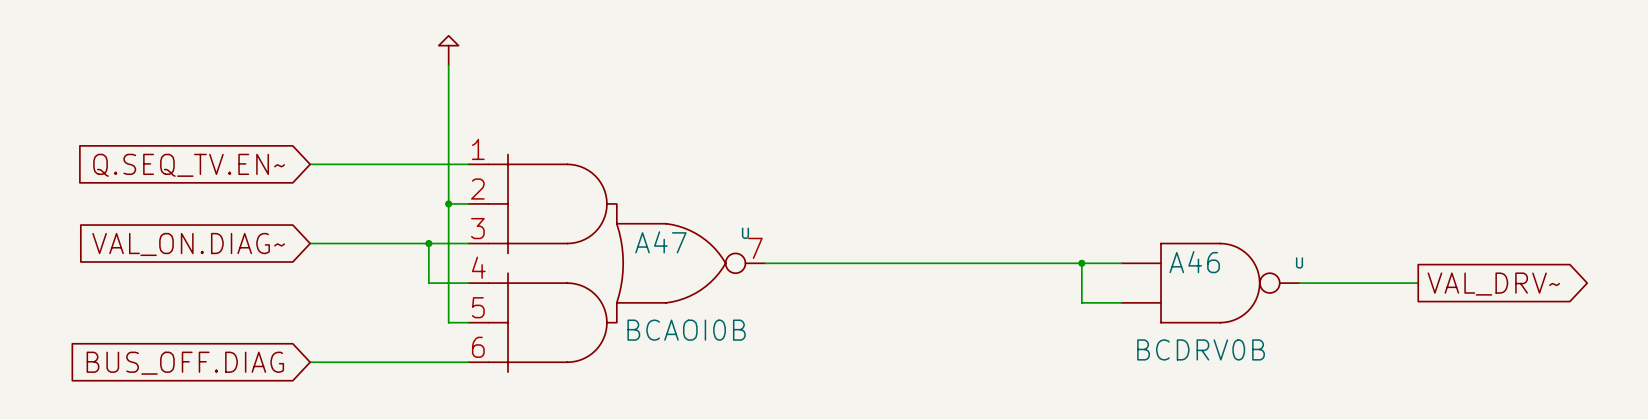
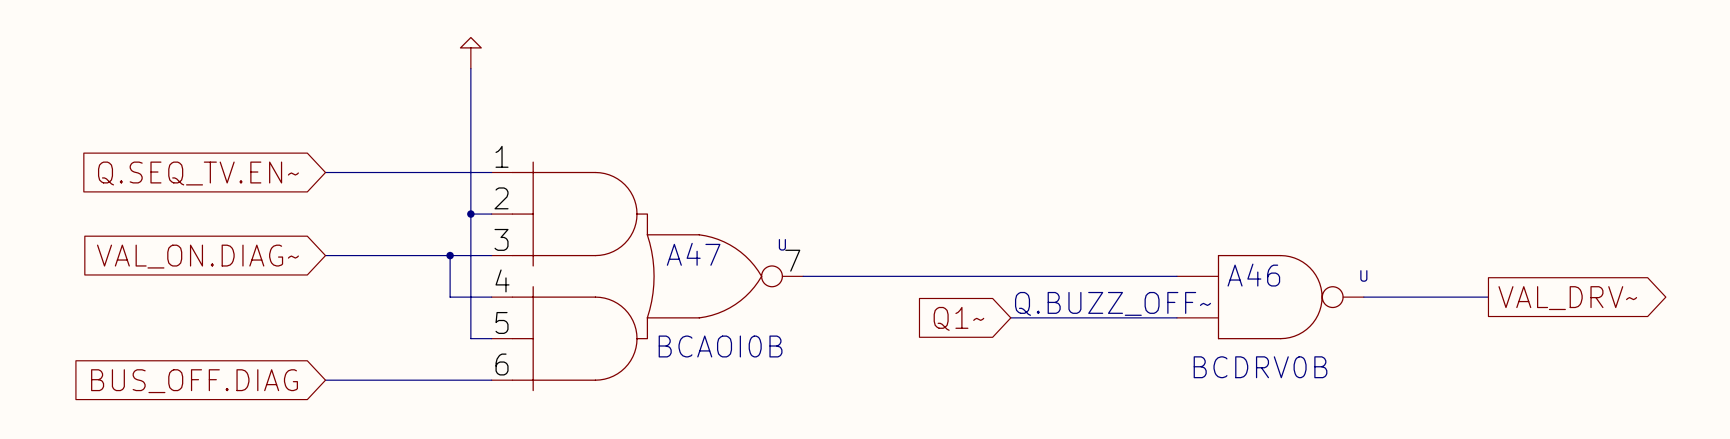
wire: (1081, 263) (1081, 302) -> (1010, 317) (1135, 317)
junction: (1081, 263) -> none
text: none -> Q.BUZZ_OFF~ (1113, 303)
global label: none -> Q1~ (958, 318)

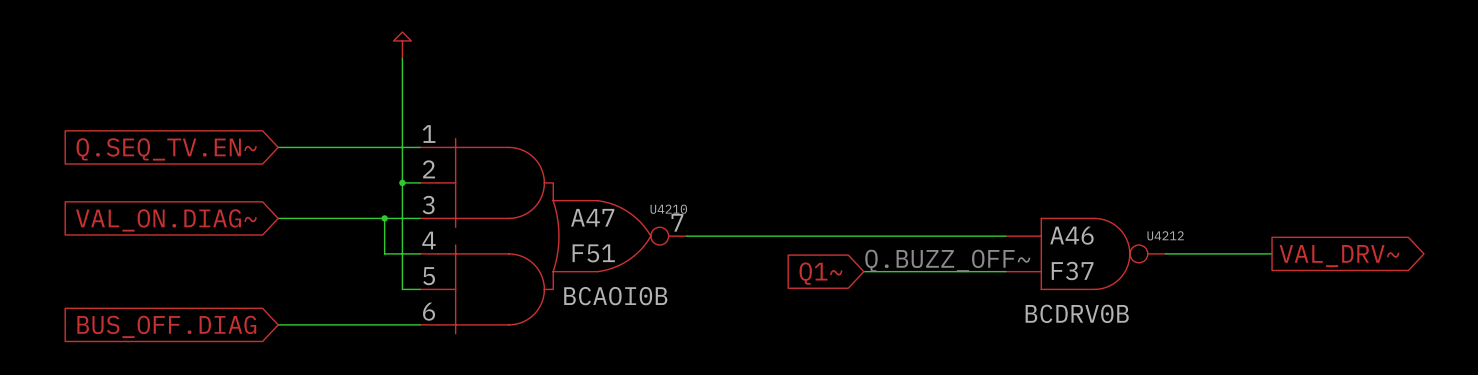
U name: U (782, 244) -> U4210 (668, 209)
U name: U (1363, 275) -> U4212 (1165, 235)
U value: none -> F51 (593, 253)
U value: none -> F37 (1072, 270)

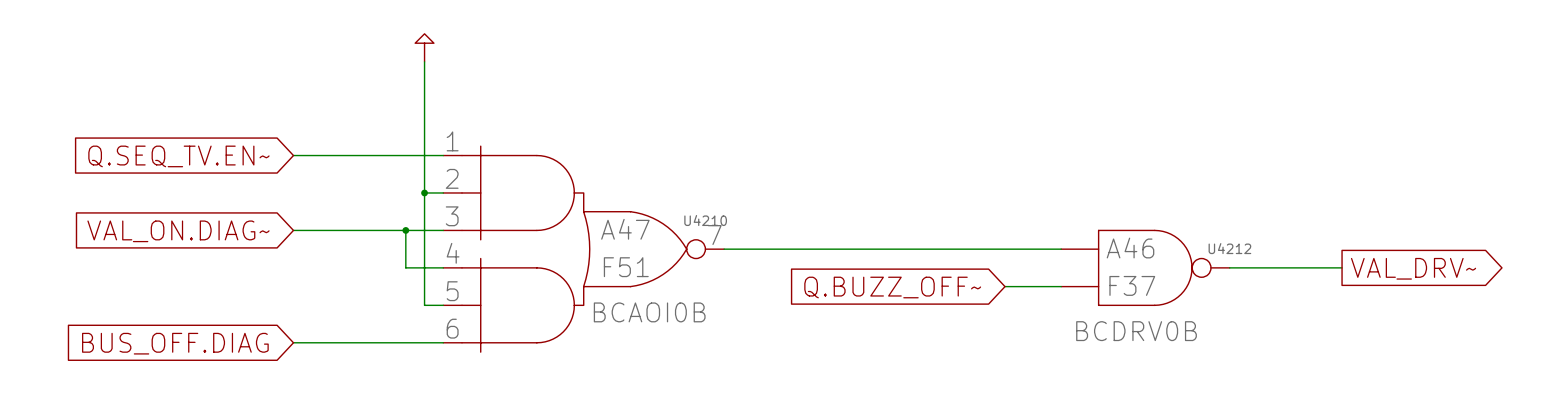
text: Q.BUZZ_OFF~ (947, 260) -> none
wire: (863, 271) (952, 271) -> none
global label: Q1~ (821, 273) -> none
global label: none -> Q.BUZZ_OFF~ (892, 287)

